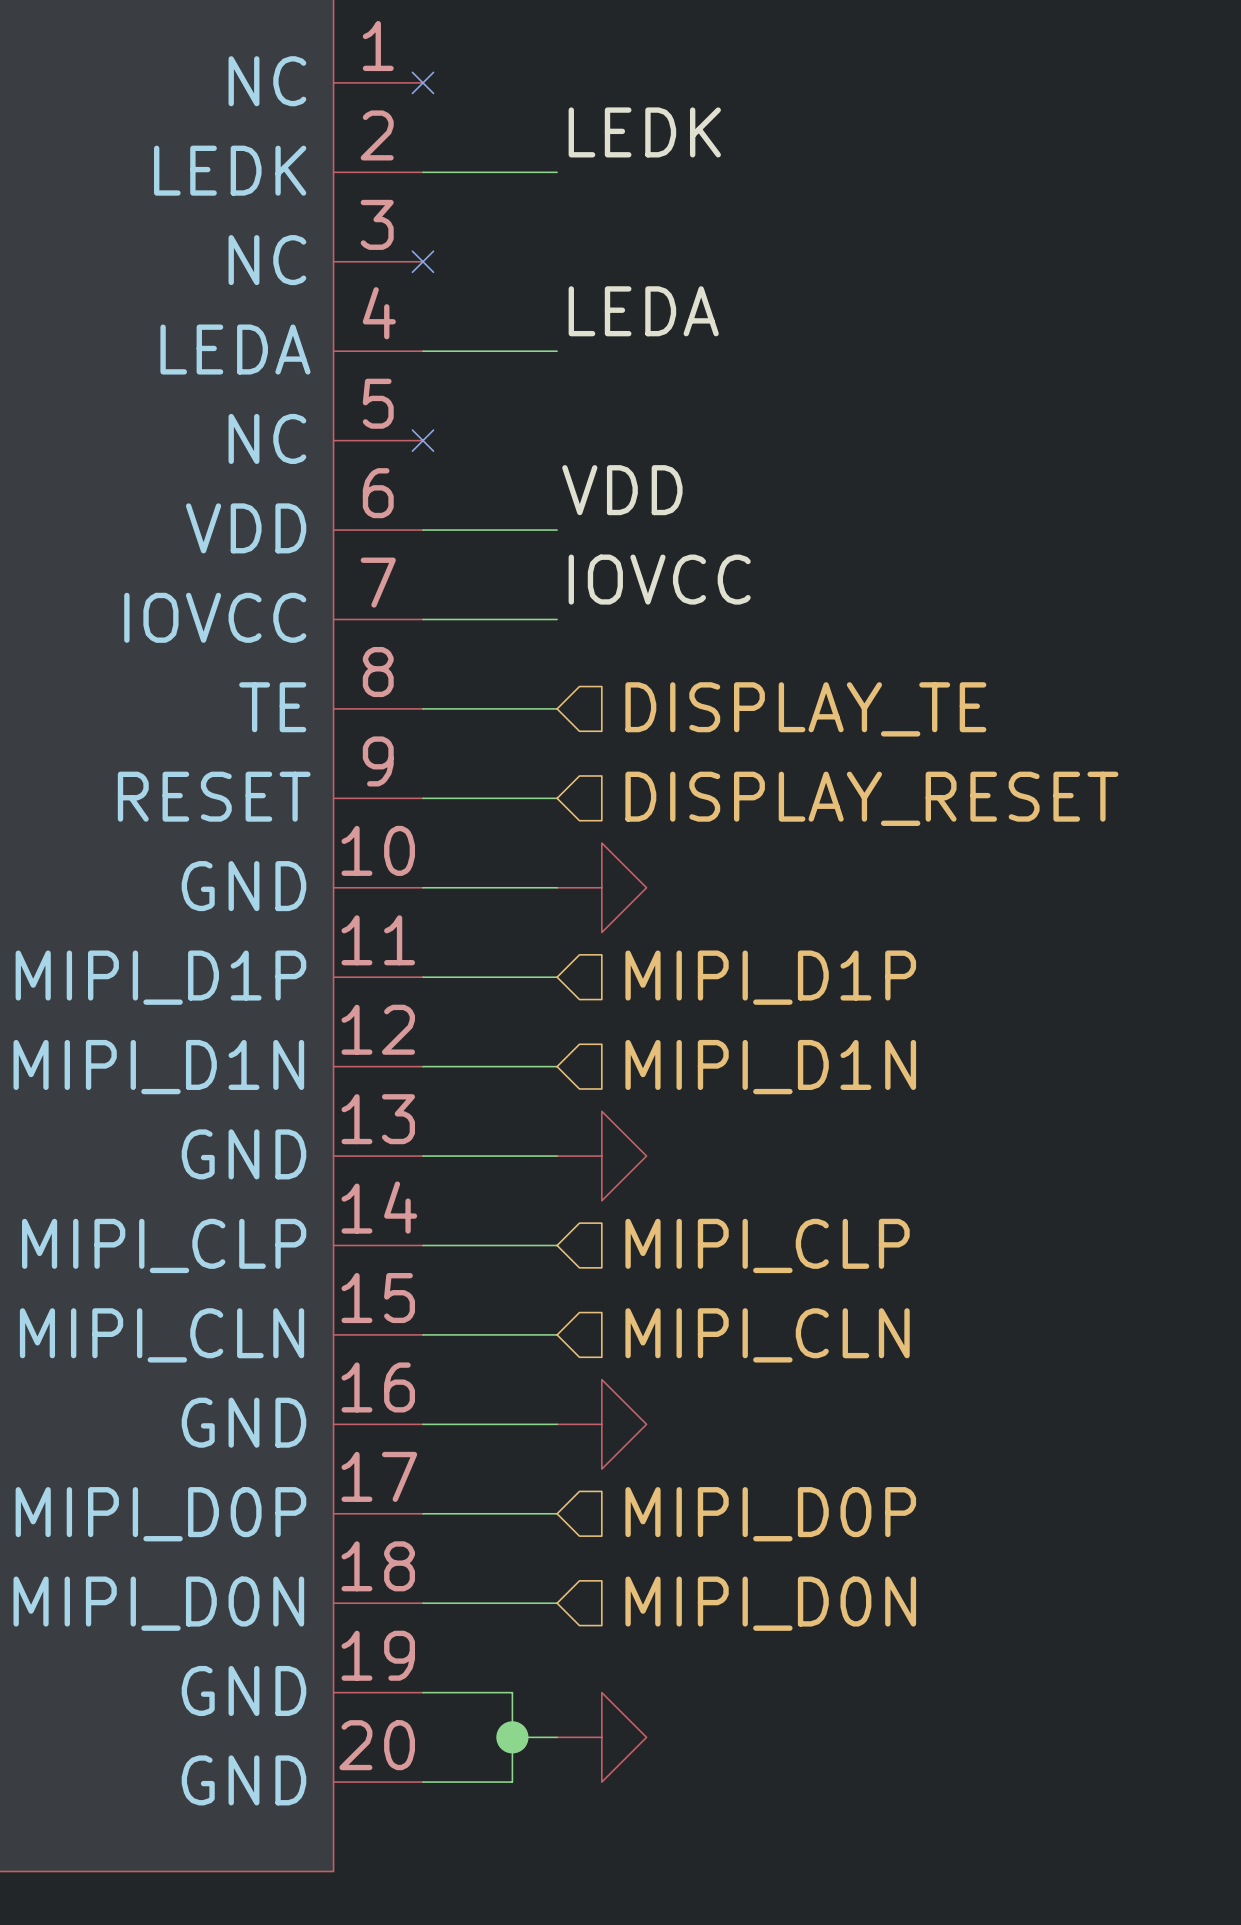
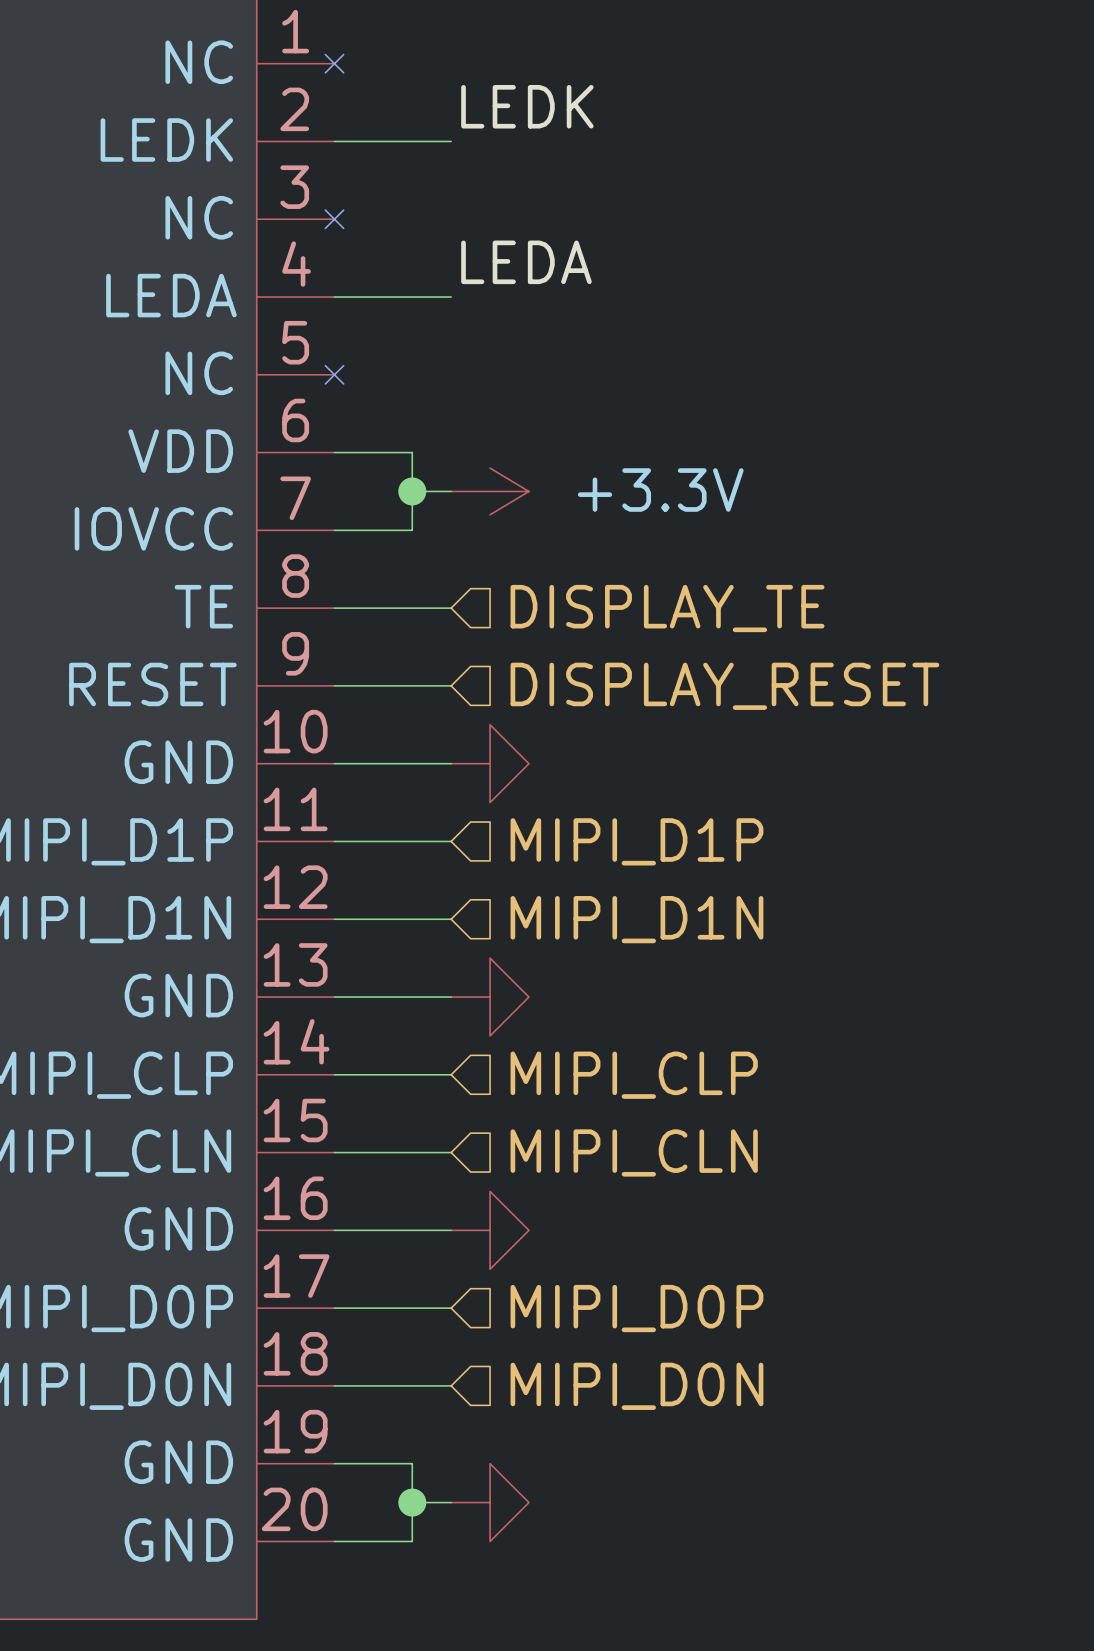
label: VDD (622, 490) -> none
wire: (512, 530) (557, 530) -> (412, 452) (412, 530)
junction: none -> (412, 491)
power symbol: none -> +3.3V (490, 491)
label: IOVCC (659, 579) -> none
wire: (512, 619) (557, 619) -> (412, 491) (451, 491)

